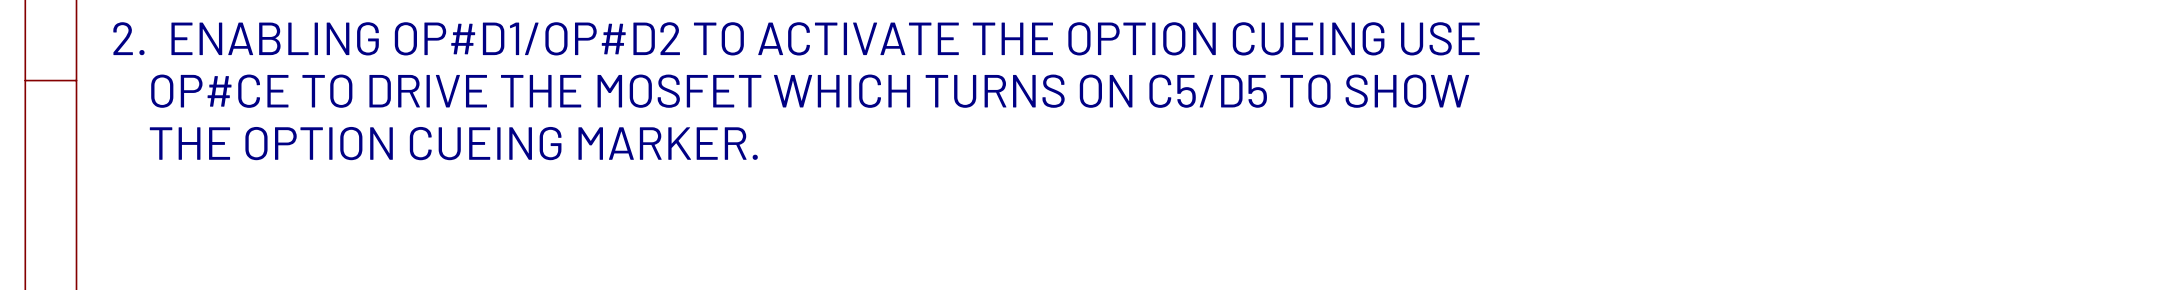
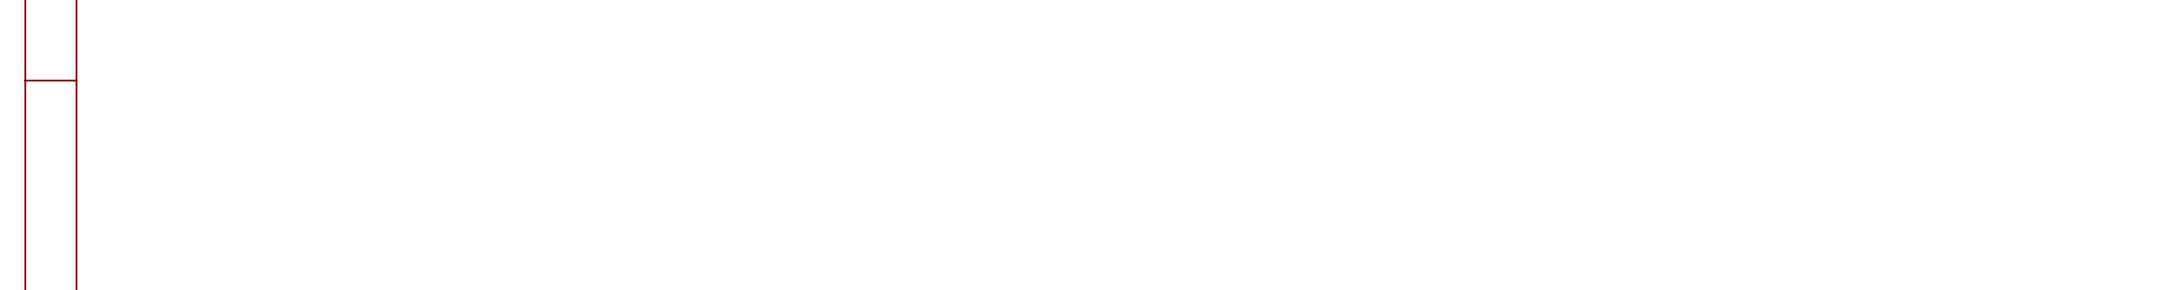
text: 2. ENABLING OP#D1/OP#D2 TO ACTIVATE THE OPTION CUEING USE (796, 38) -> none
text: OP#CE TO DRIVE THE MOSFET WHICH TURNS ON C5/D5 TO SHOW (810, 91) -> none
text: THE OPTION CUEING MARKER. (453, 143) -> none

